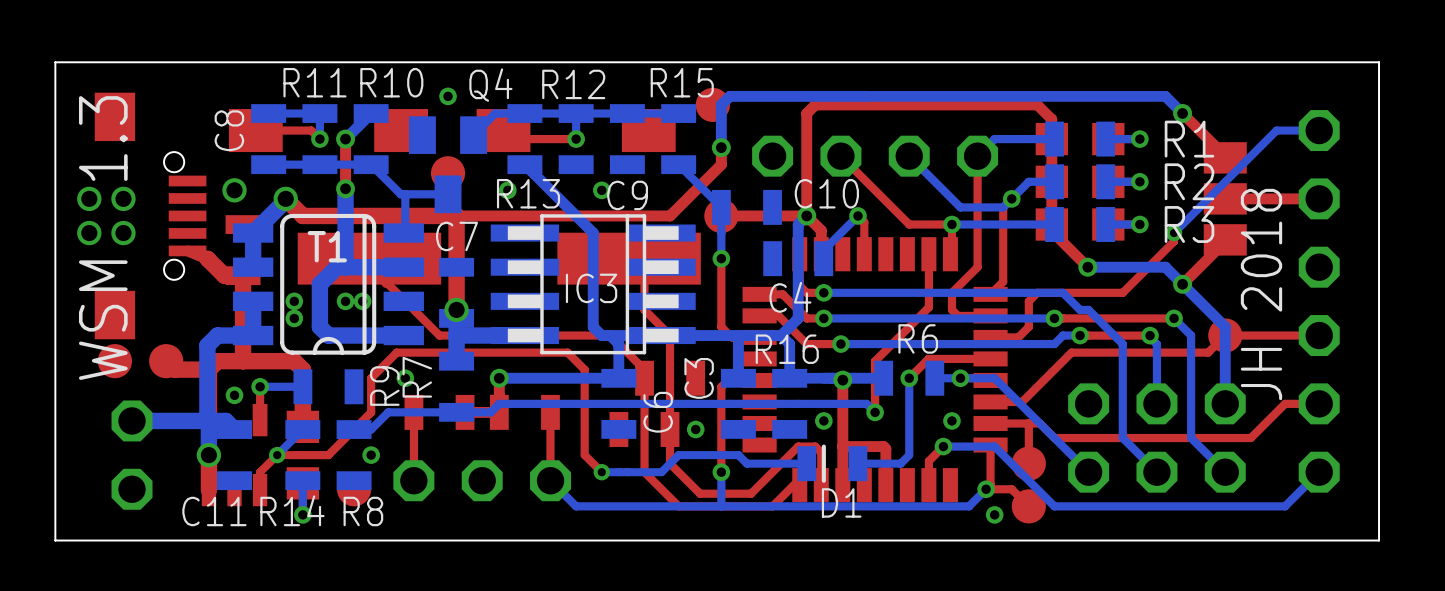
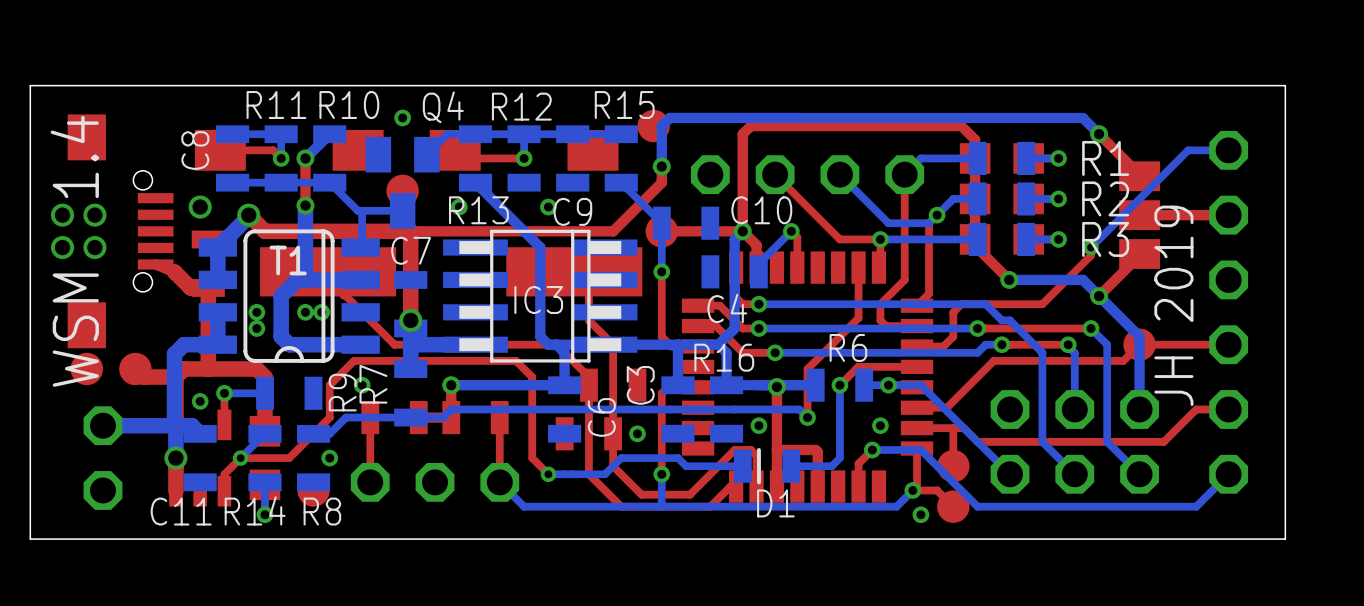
text: 1.3 (103, 138) -> 1.4 (74, 157)
text: JH 2018 (1261, 294) -> JH 2019 (1173, 305)

